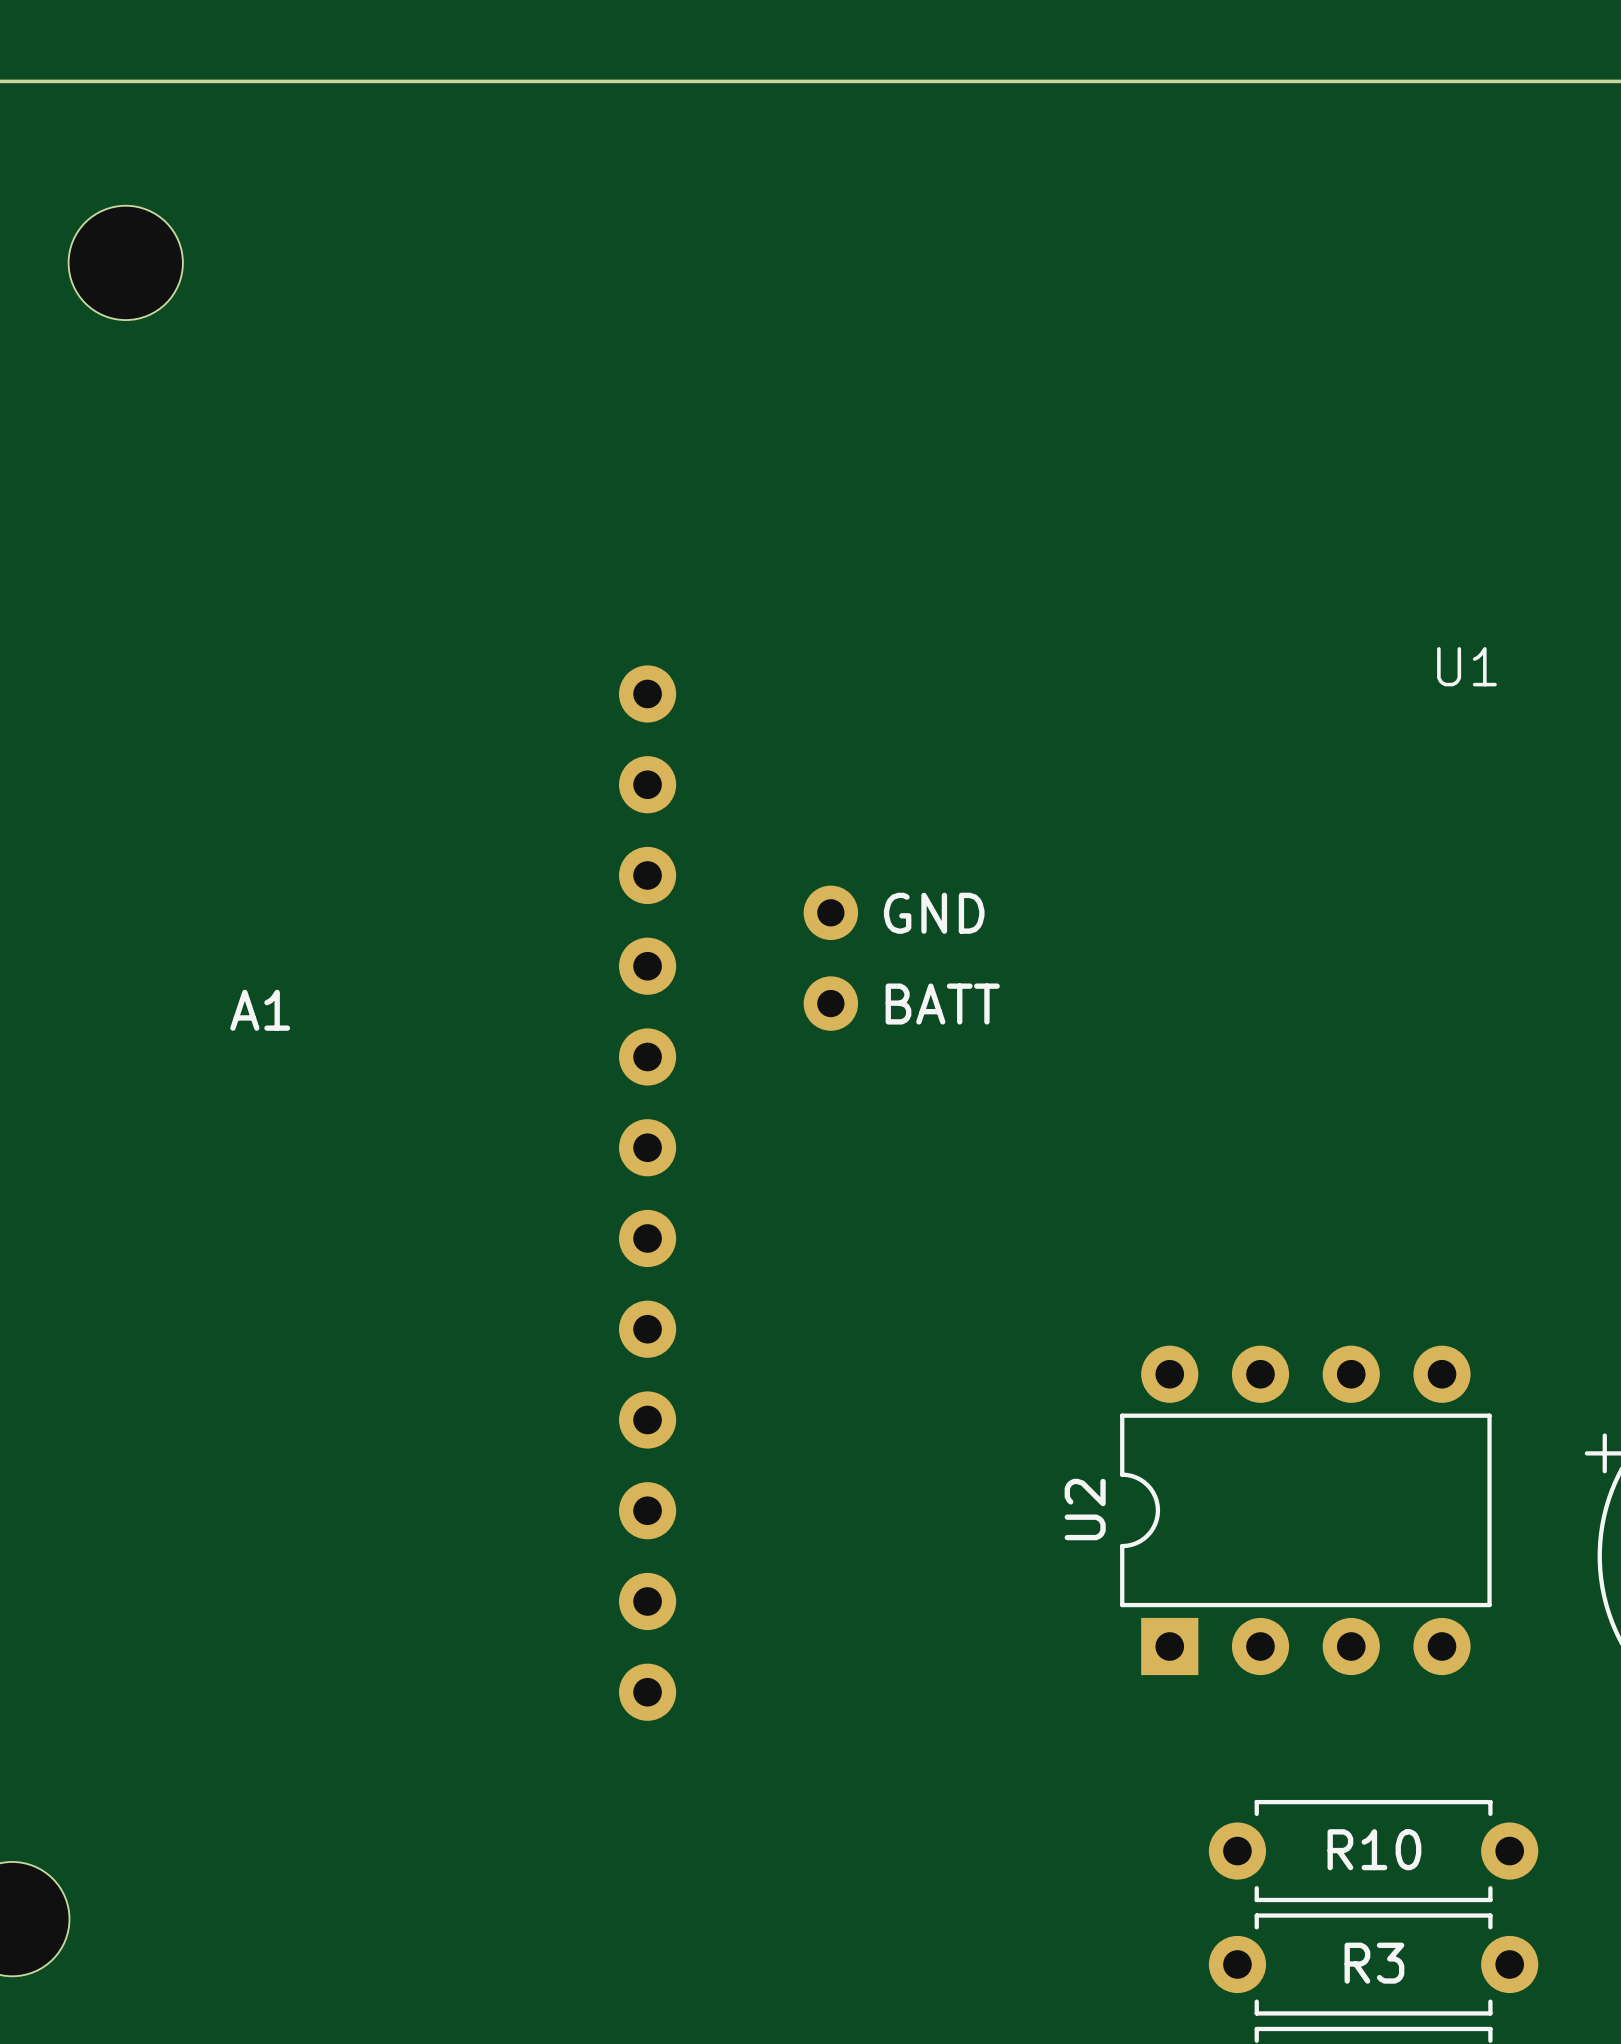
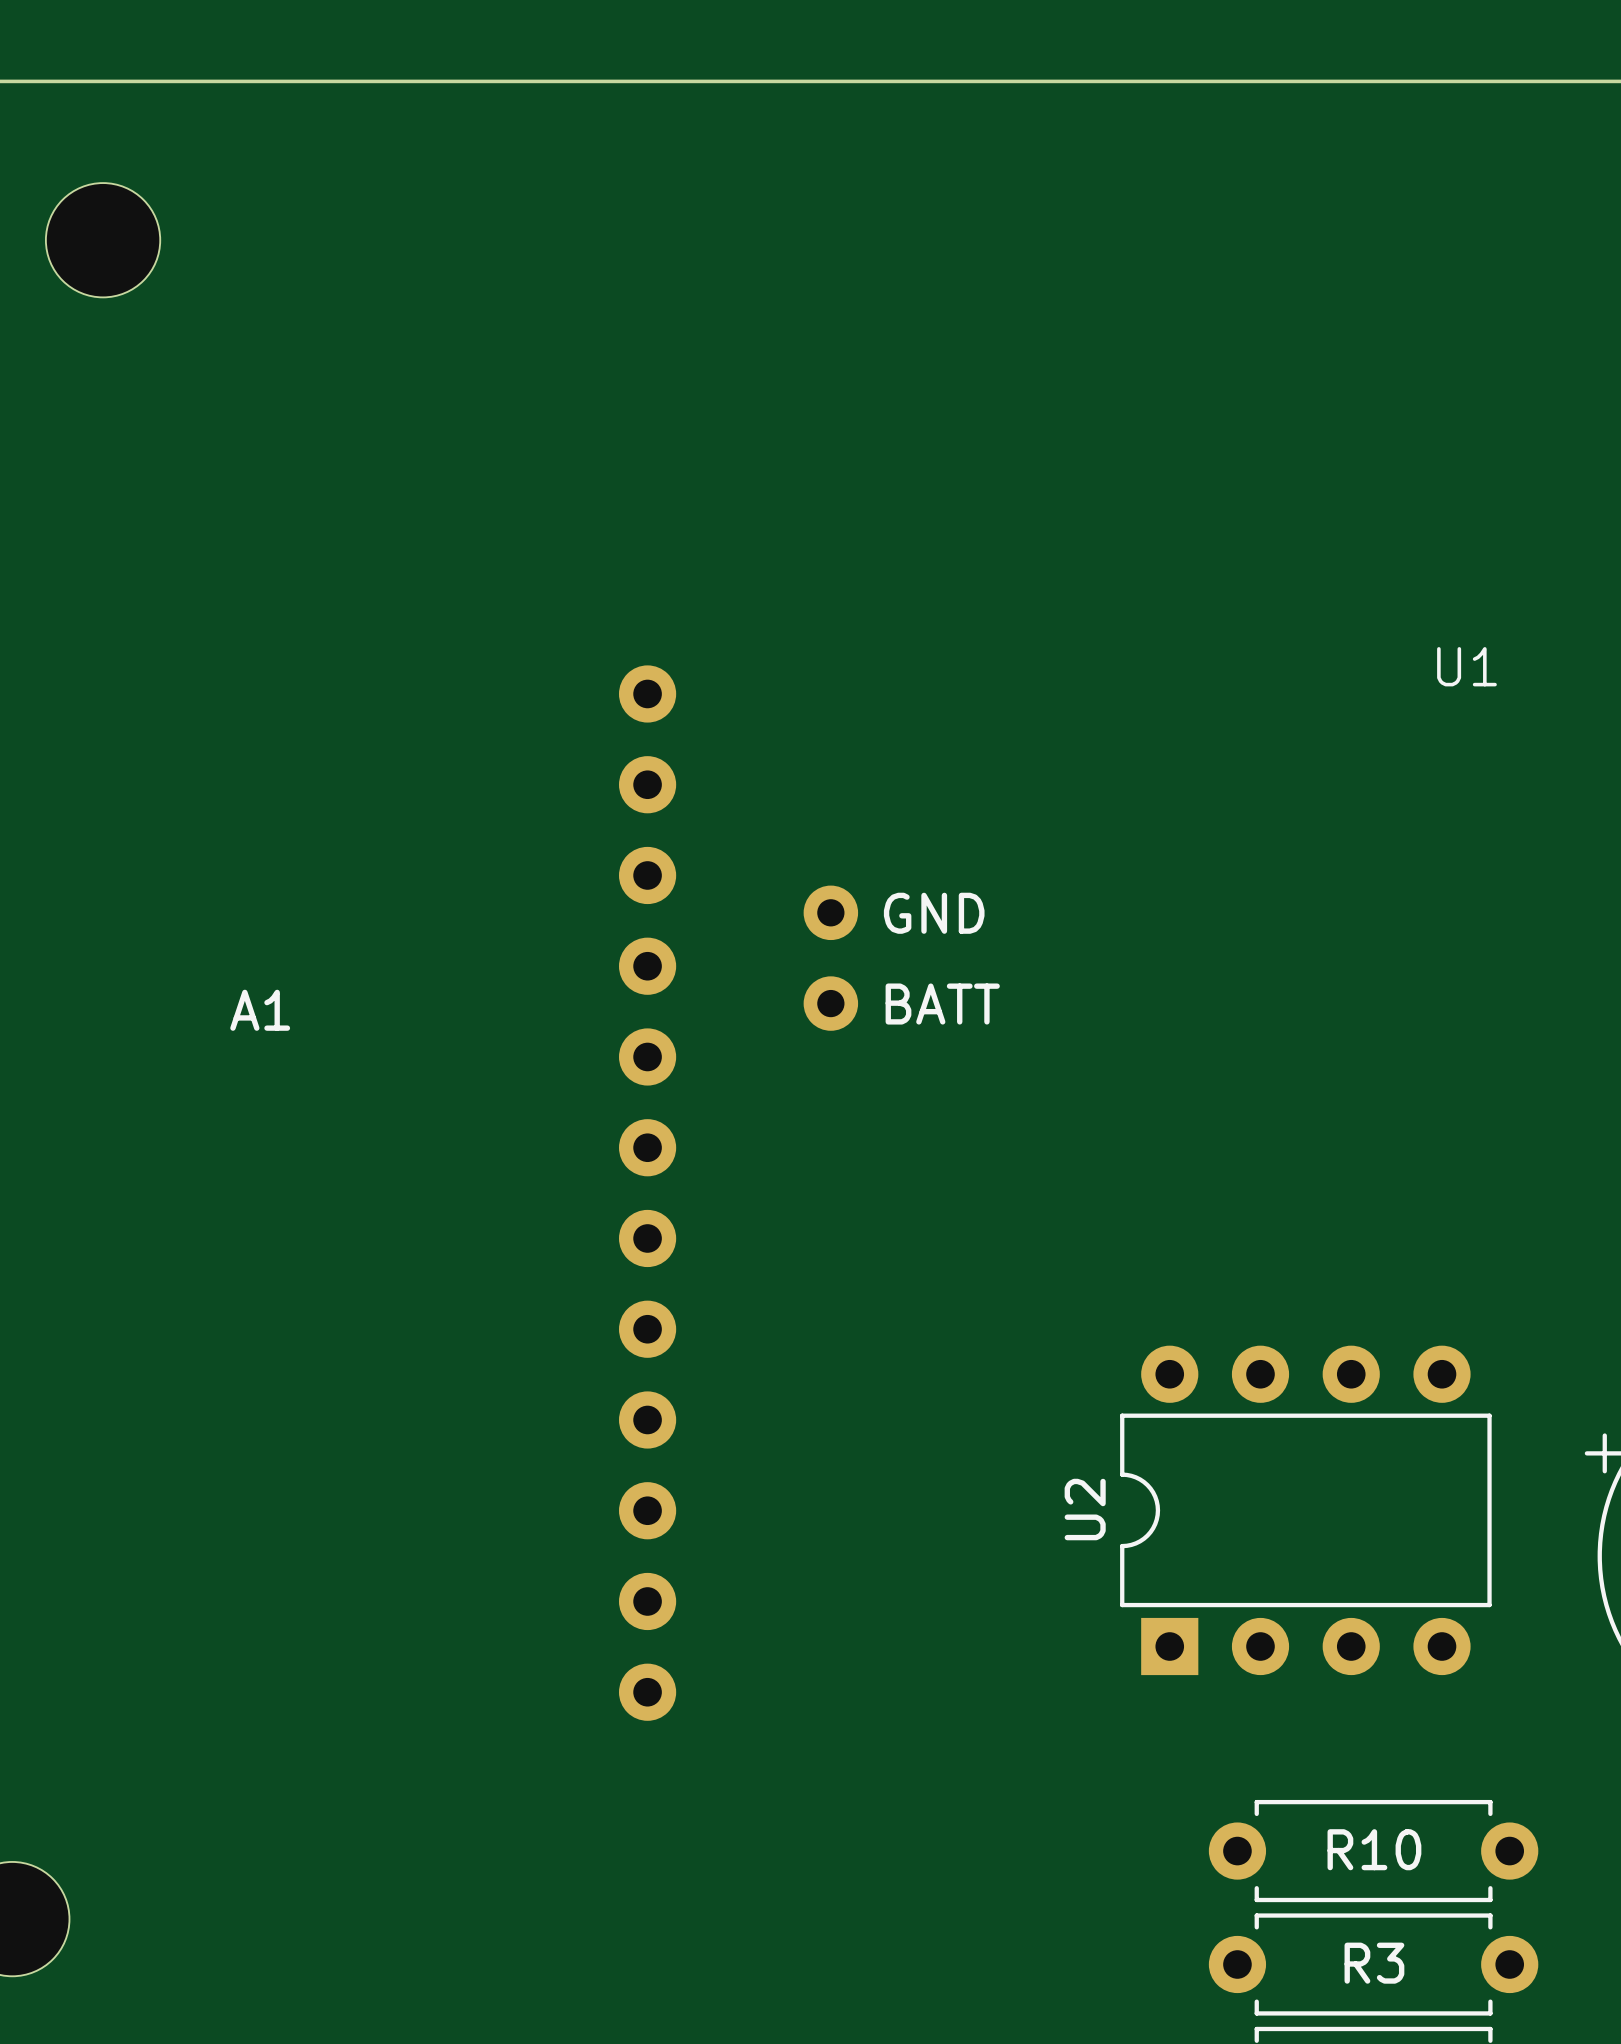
part position: (125, 262) -> (103, 240)

